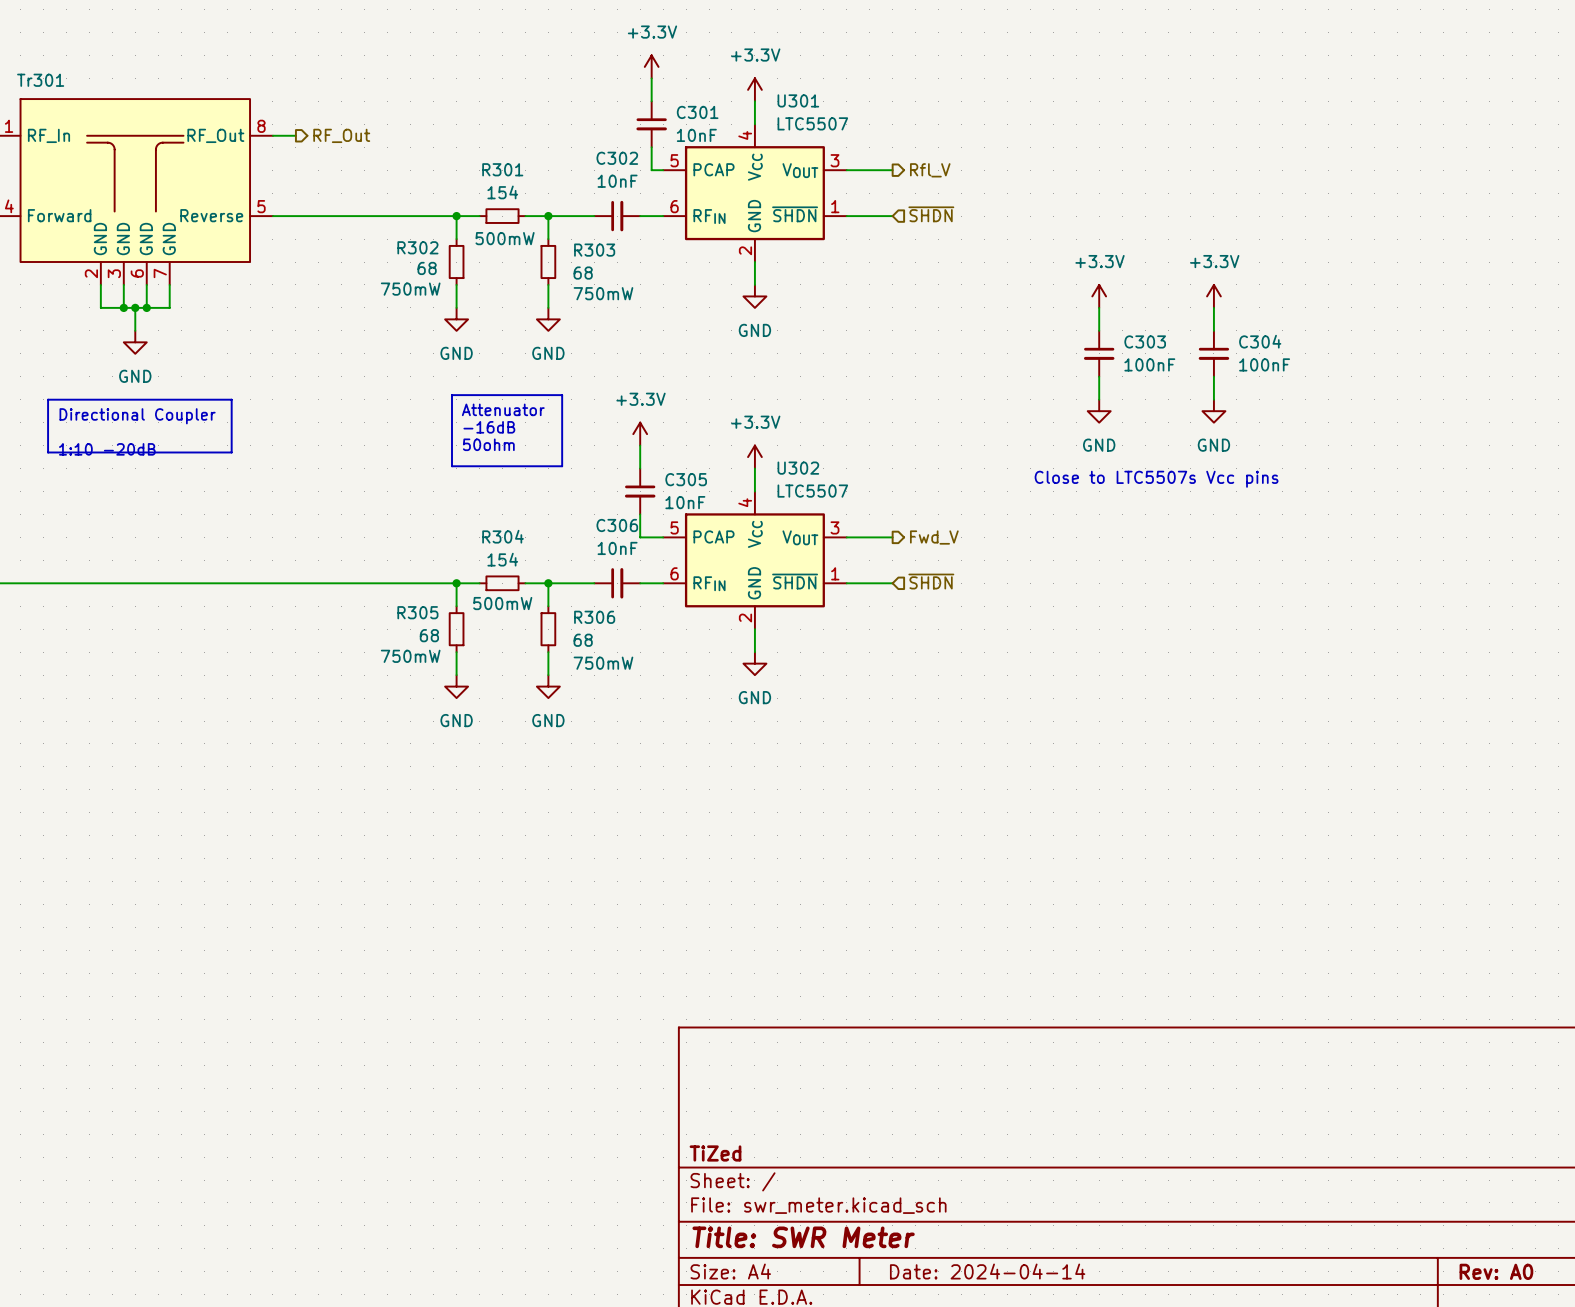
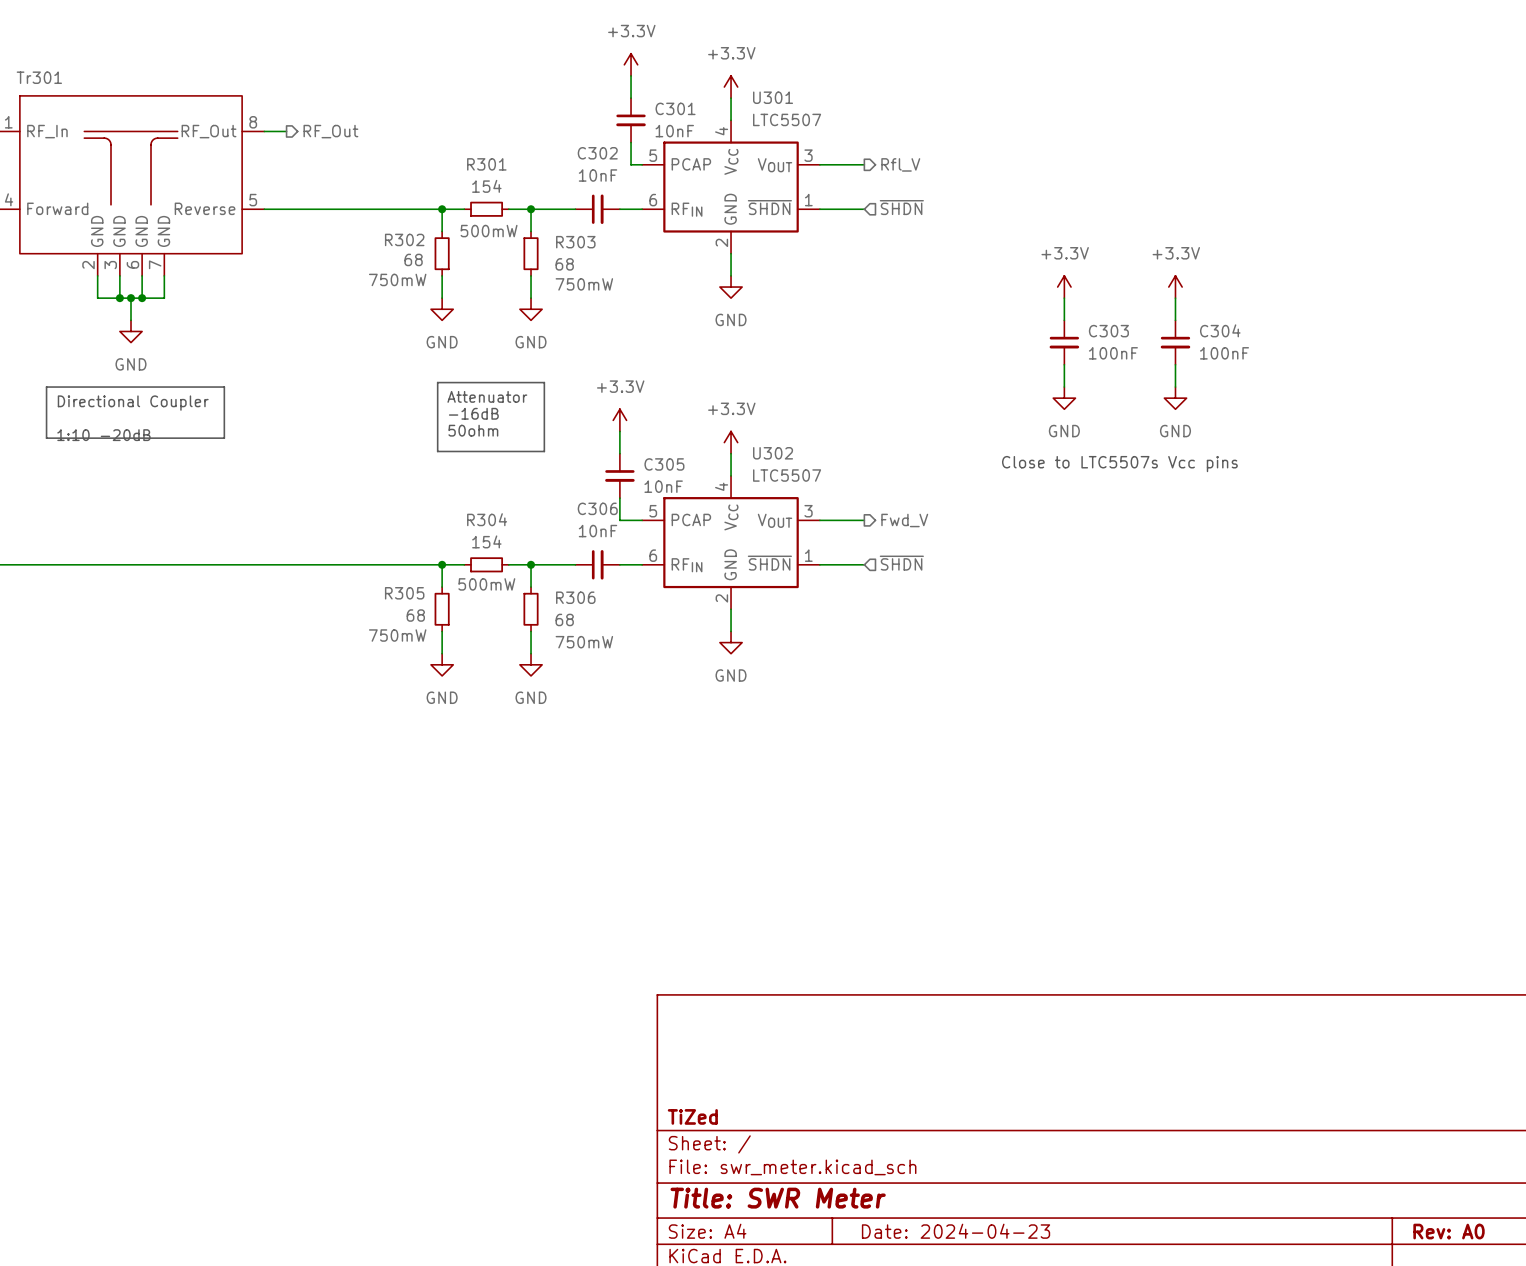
title block: Date: 2024-04-14 (987, 1271) -> Date: 2024-04-23 (956, 1231)

